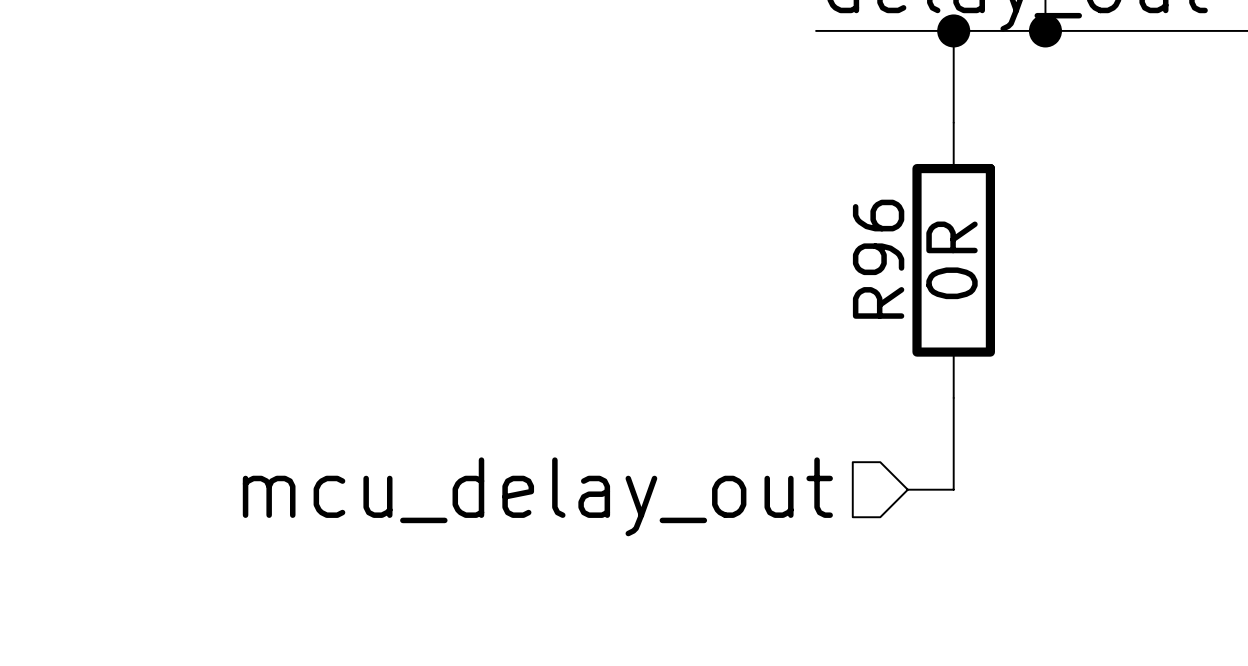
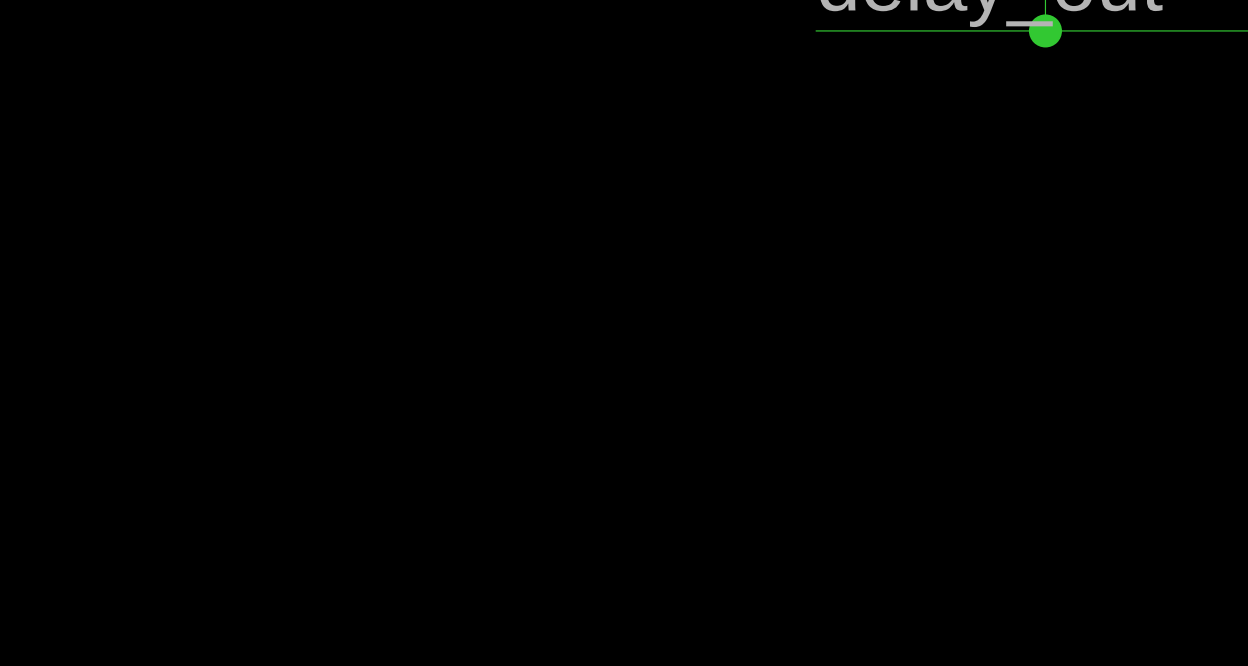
wire: (953, 30) (953, 122) -> none
junction: (953, 30) -> none
R96: 0R (953, 260) -> none
wire: (953, 397) (953, 489) (907, 489) -> none
hierarchical label: mcu_delay_out (537, 496) -> none

